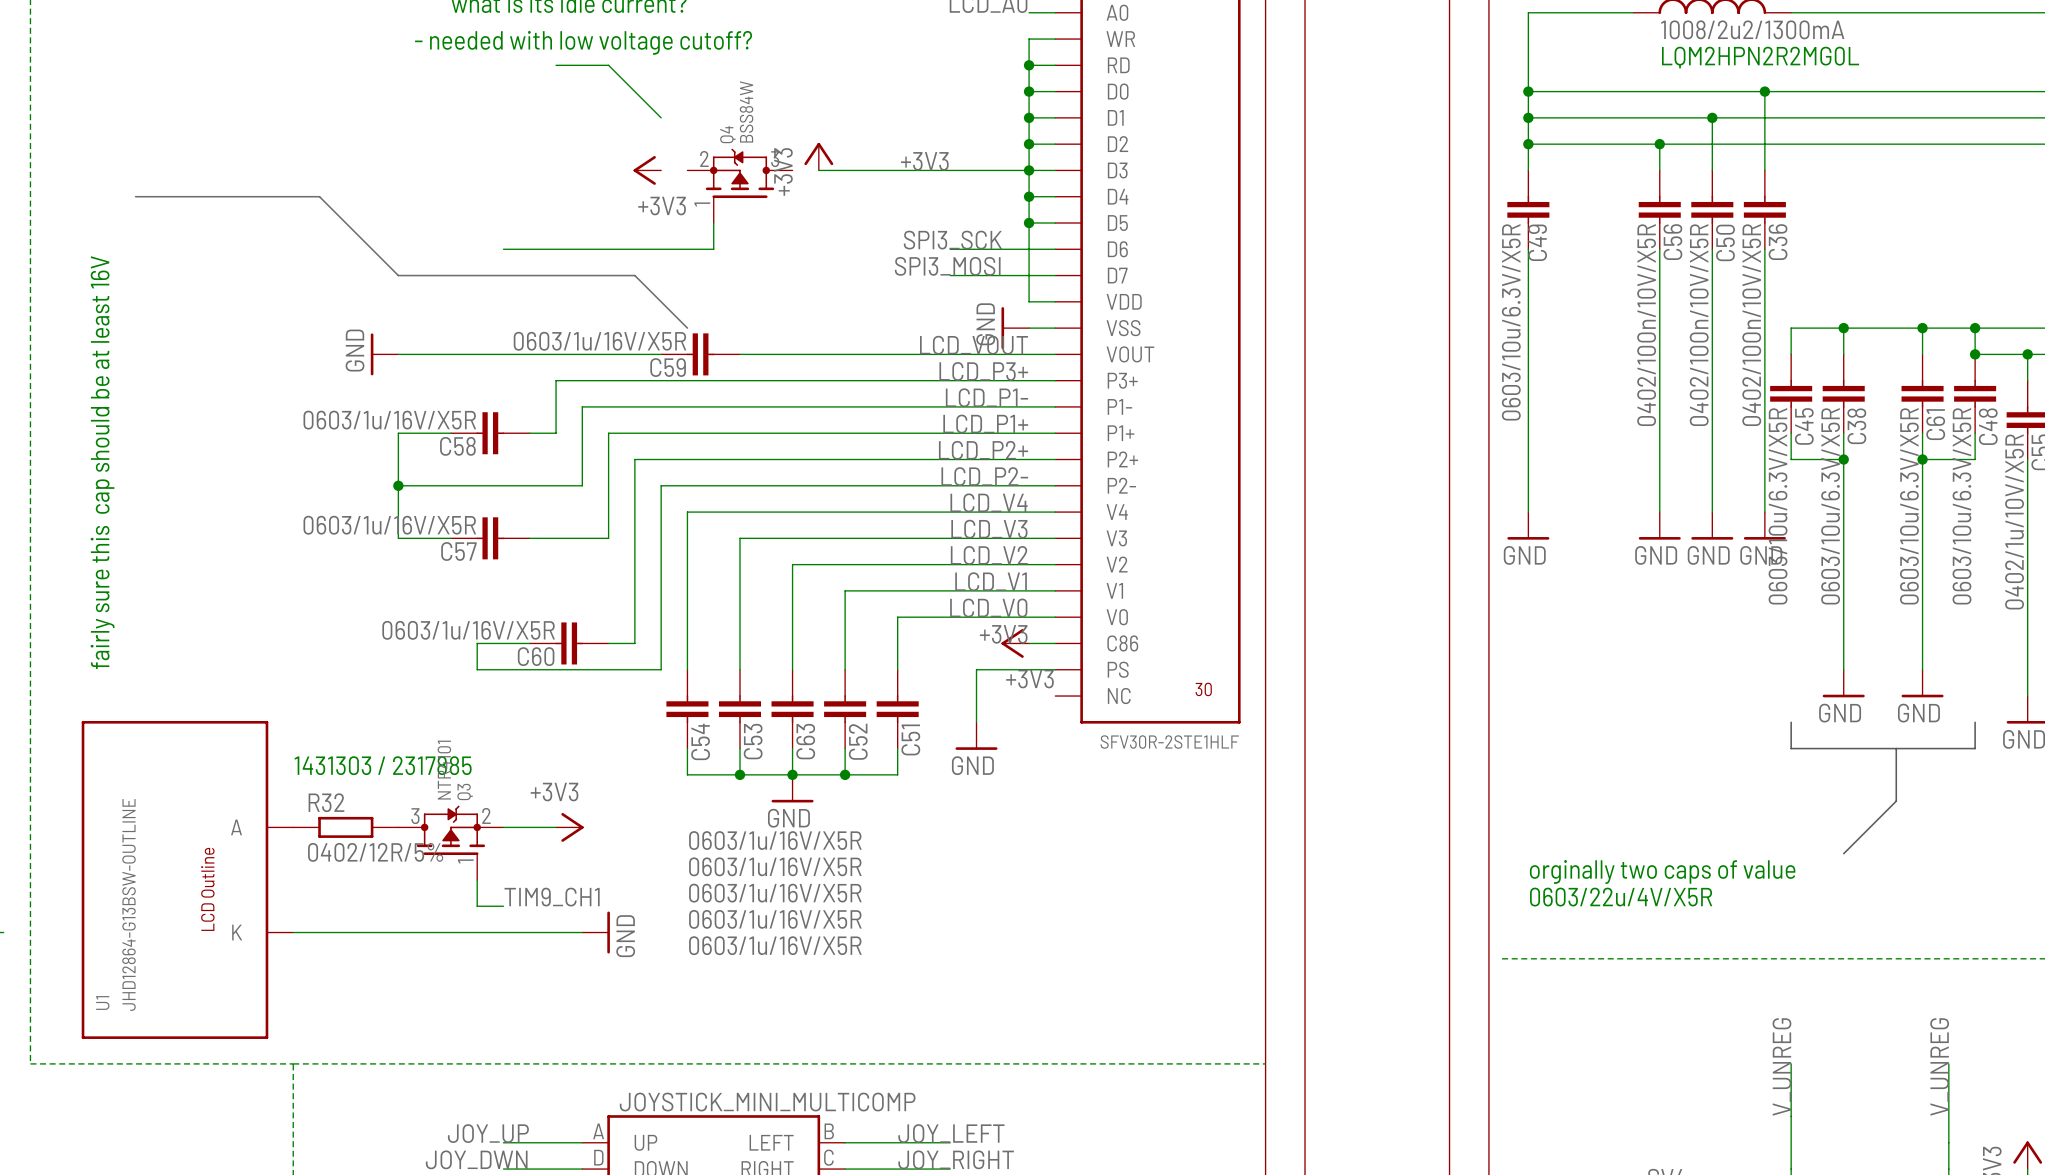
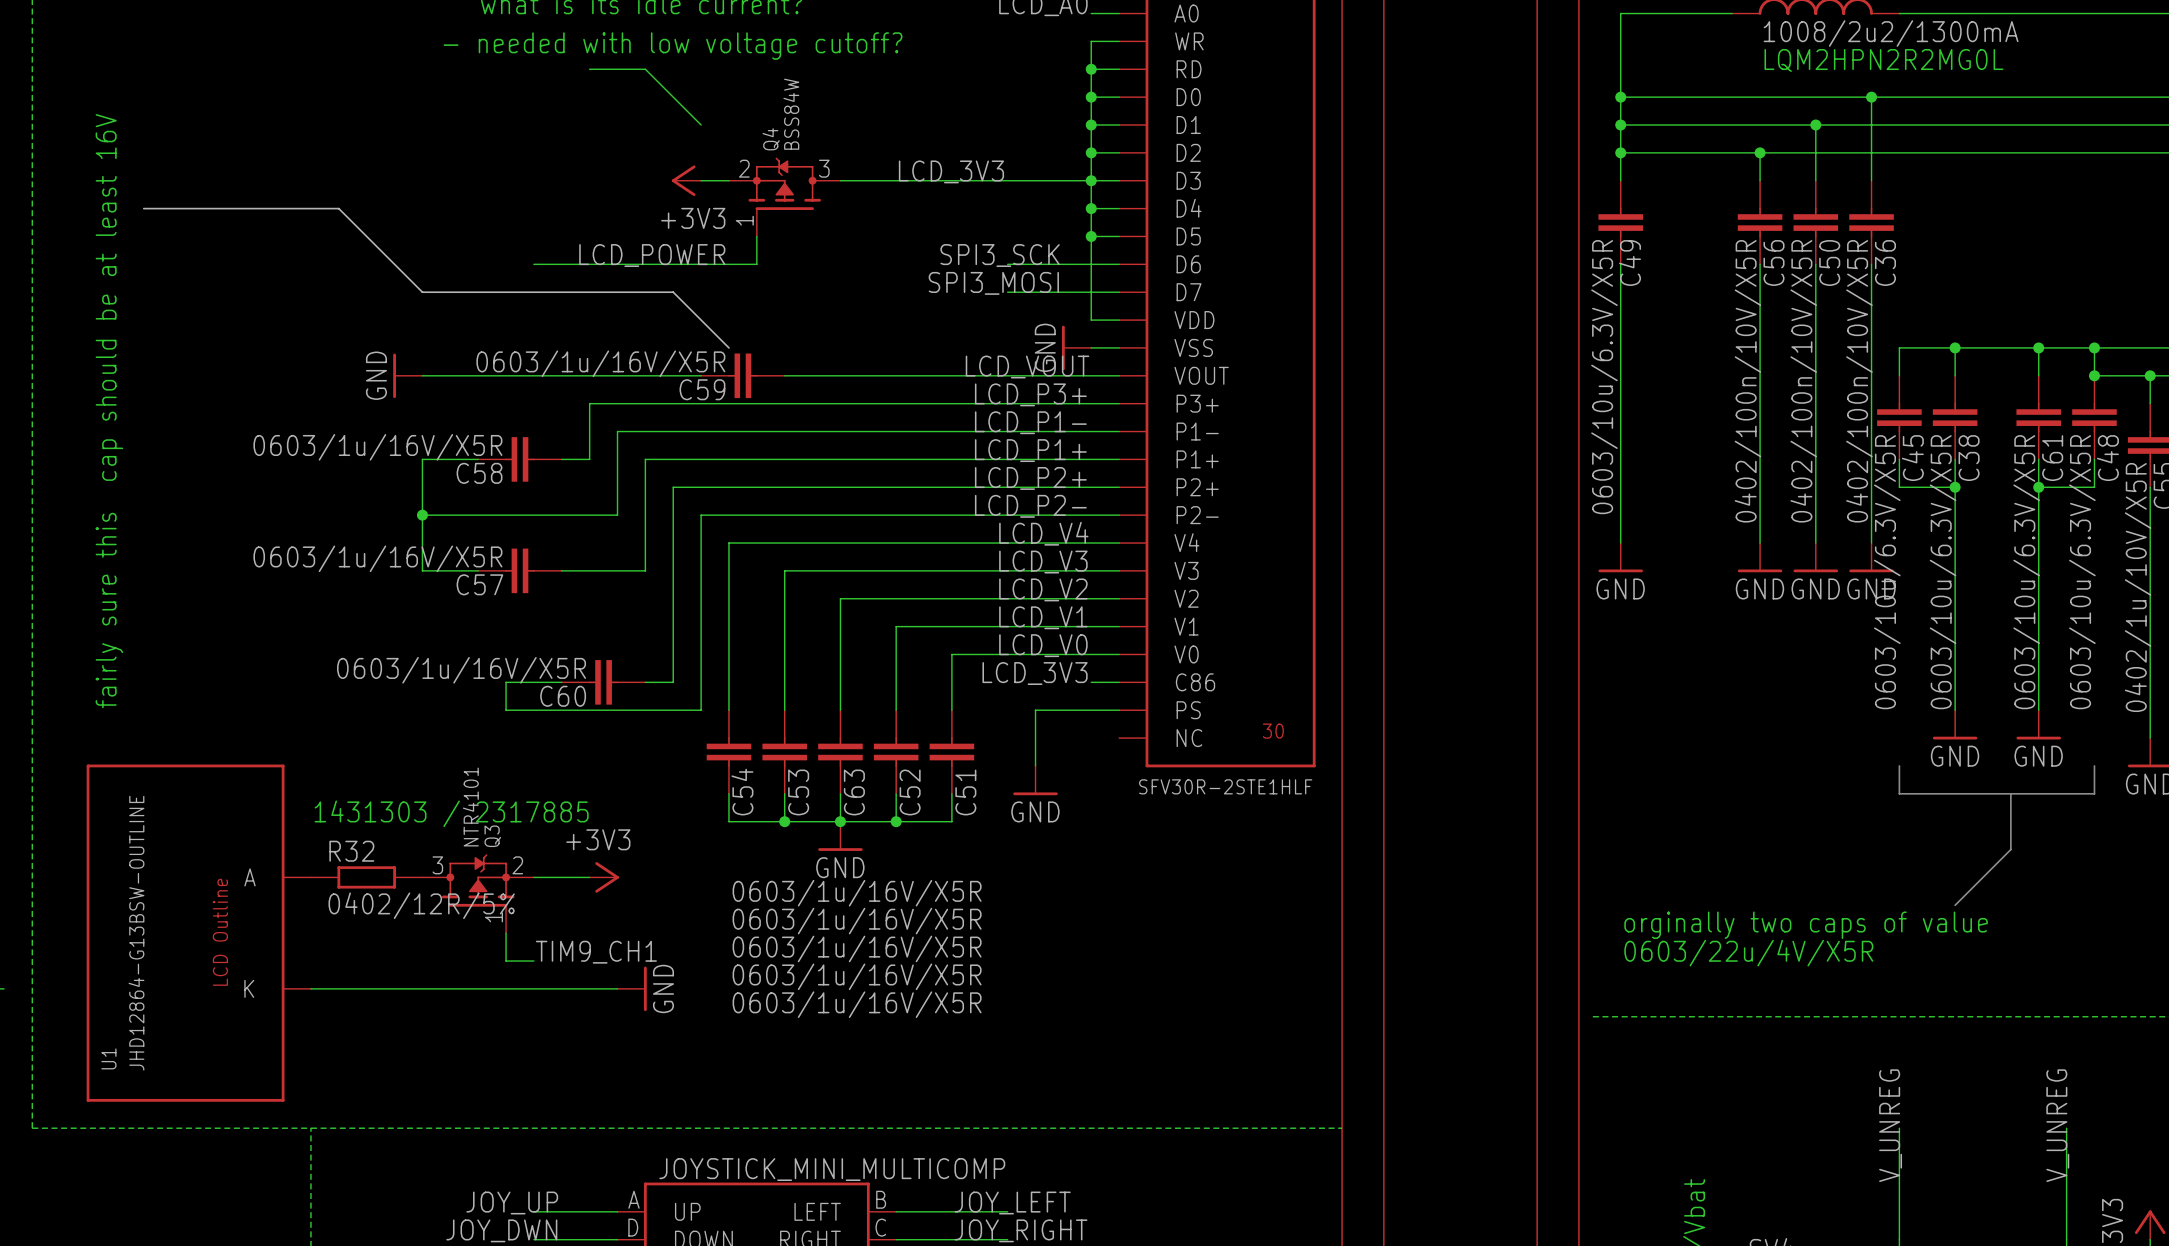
power symbol: +3V3 (818, 156) -> none
label: +3V3 (924, 161) -> LCD_3V3 (951, 171)
wire: none -> (701, 180) (728, 180)
wire: none -> (840, 180) (868, 180)
label: none -> LCD_POWER (652, 255)
label: +3V3 (1003, 634) -> LCD_3V3 (1035, 673)
power symbol: +3V3 (1015, 643) -> none

